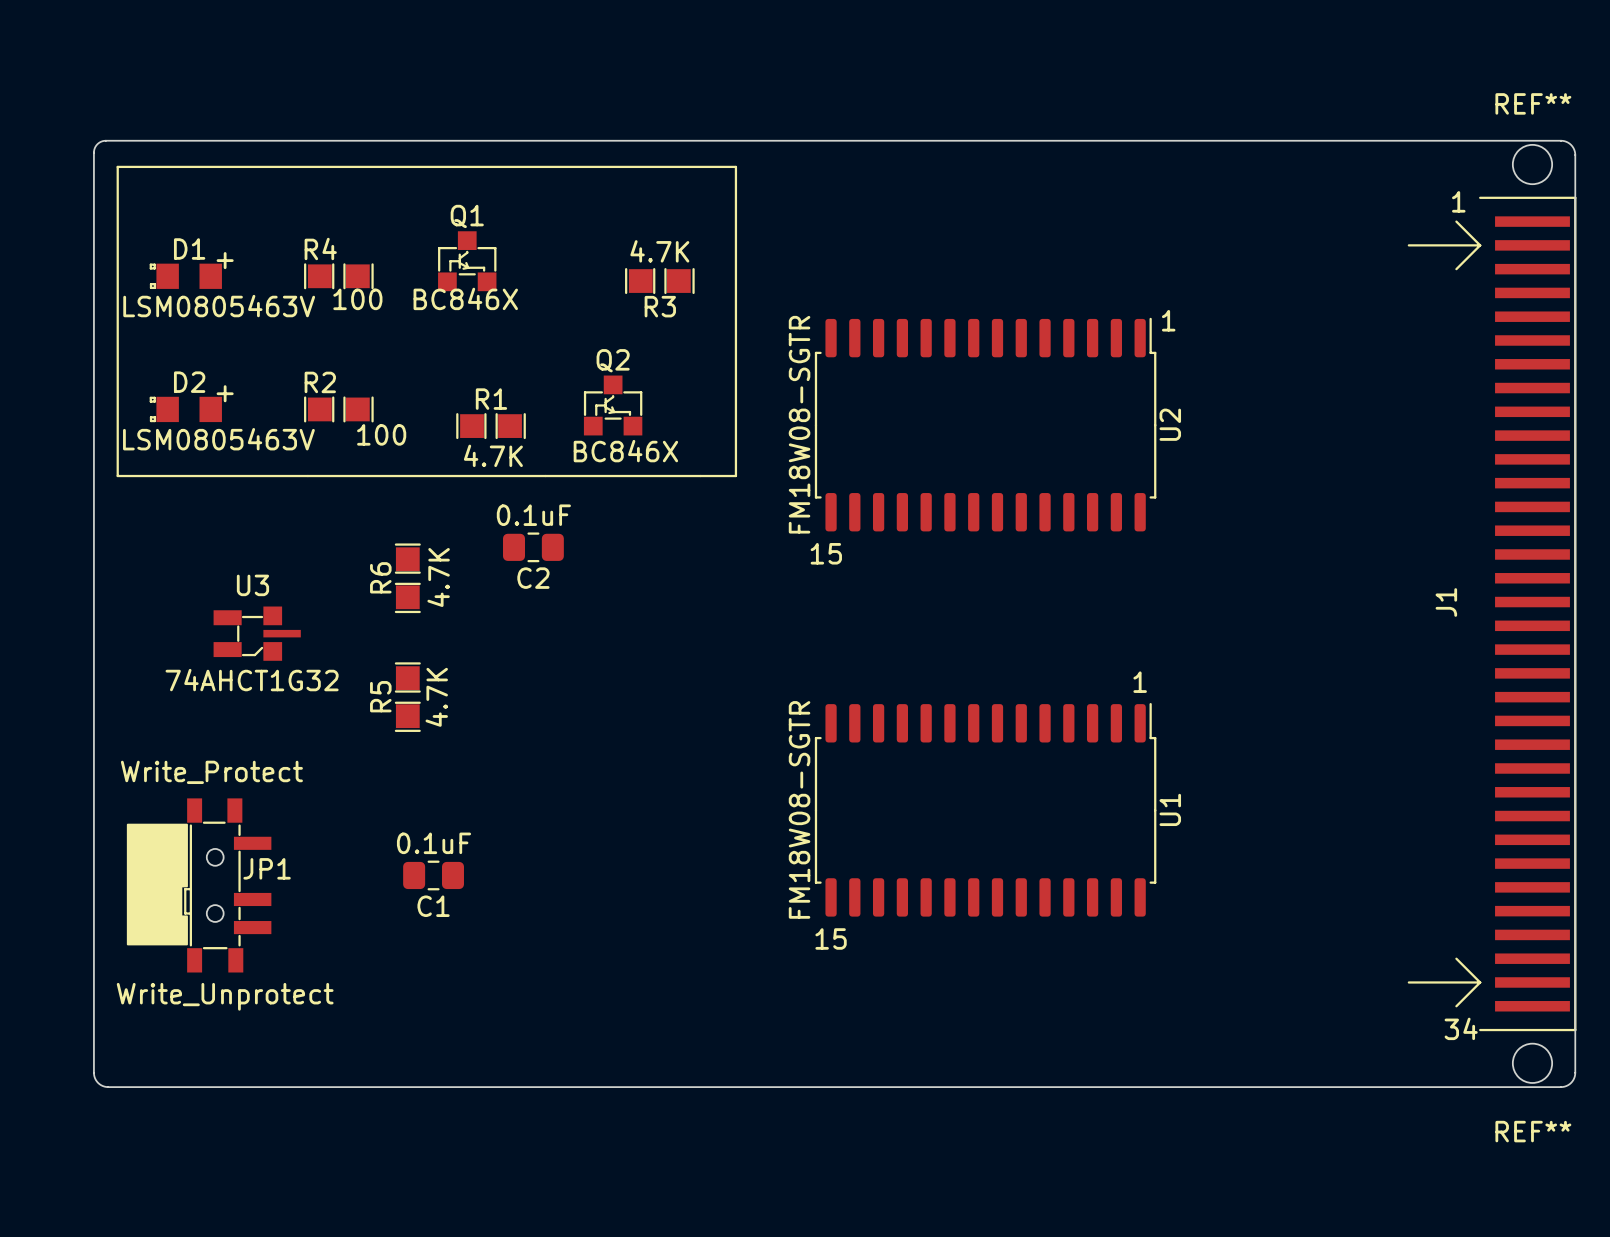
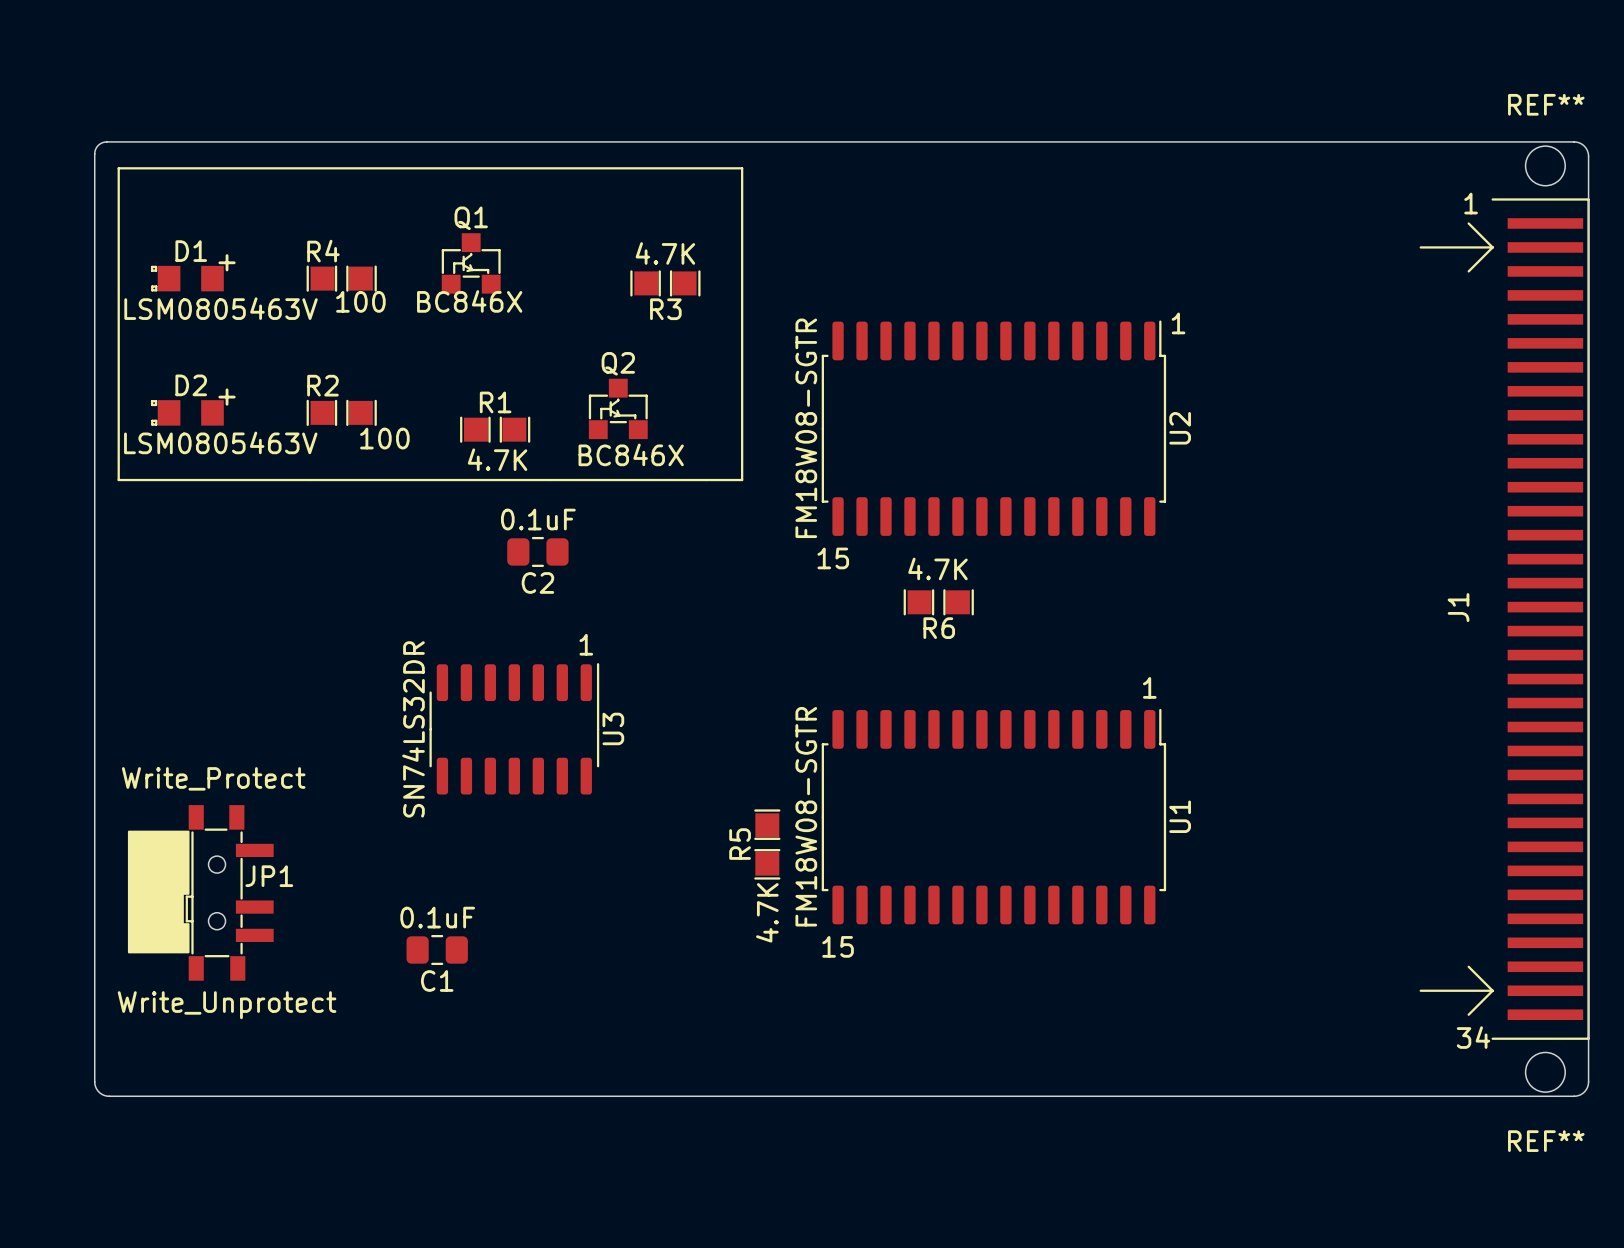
R6 value position: 4.7K (438, 577) -> 4.7K (937, 568)
R6 rotation: 0° (407, 578) -> 90° clockwise (938, 602)
R6 position: (407, 578) -> (938, 602)
U3 name position: U3 (252, 585) -> U3 (613, 728)
U3 footprint: [213, 606, 301, 661] -> [429, 663, 600, 795]
text: none -> 1 (586, 644)
U3 value: 74AHCT1G32 (252, 680) -> SN74LS32DR (413, 729)
R5 position: (407, 697) -> (767, 844)
R5 value position: 4.7K (436, 697) -> 4.7K (767, 912)
C1 position: (433, 875) -> (437, 950)

